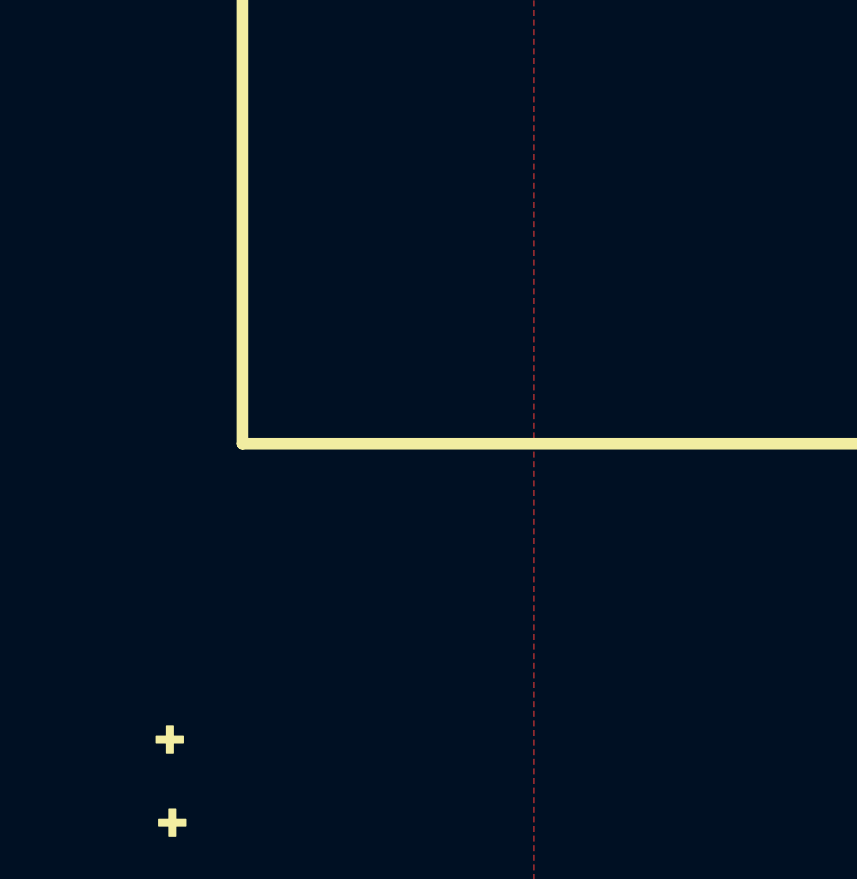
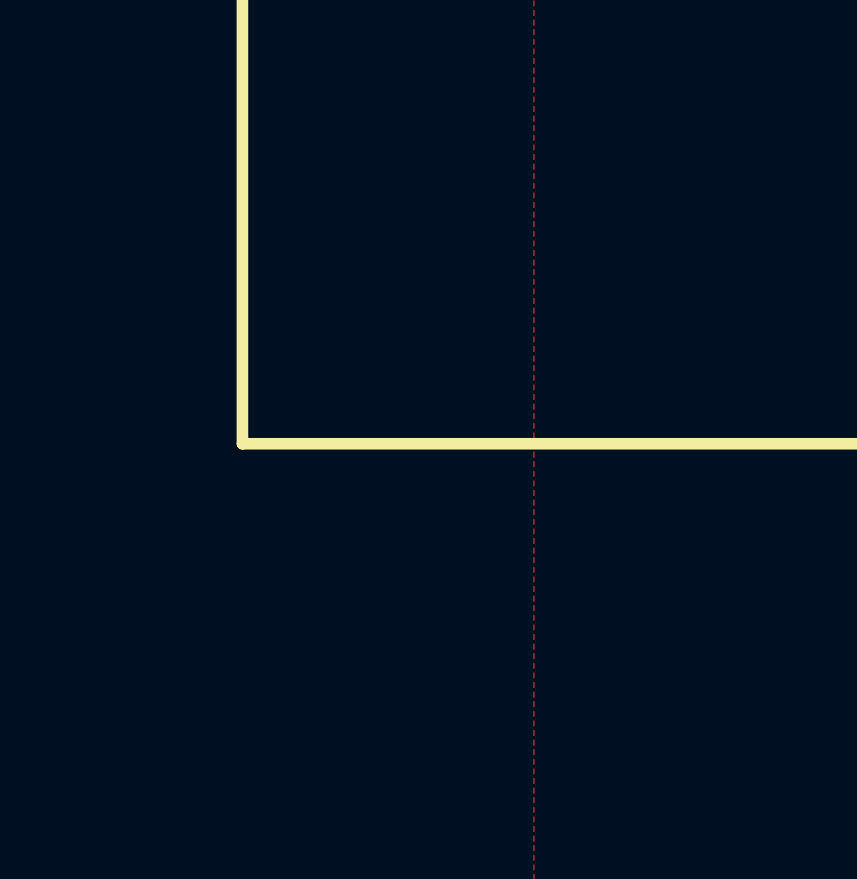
text: + (169, 739) -> none
text: + (172, 822) -> none

